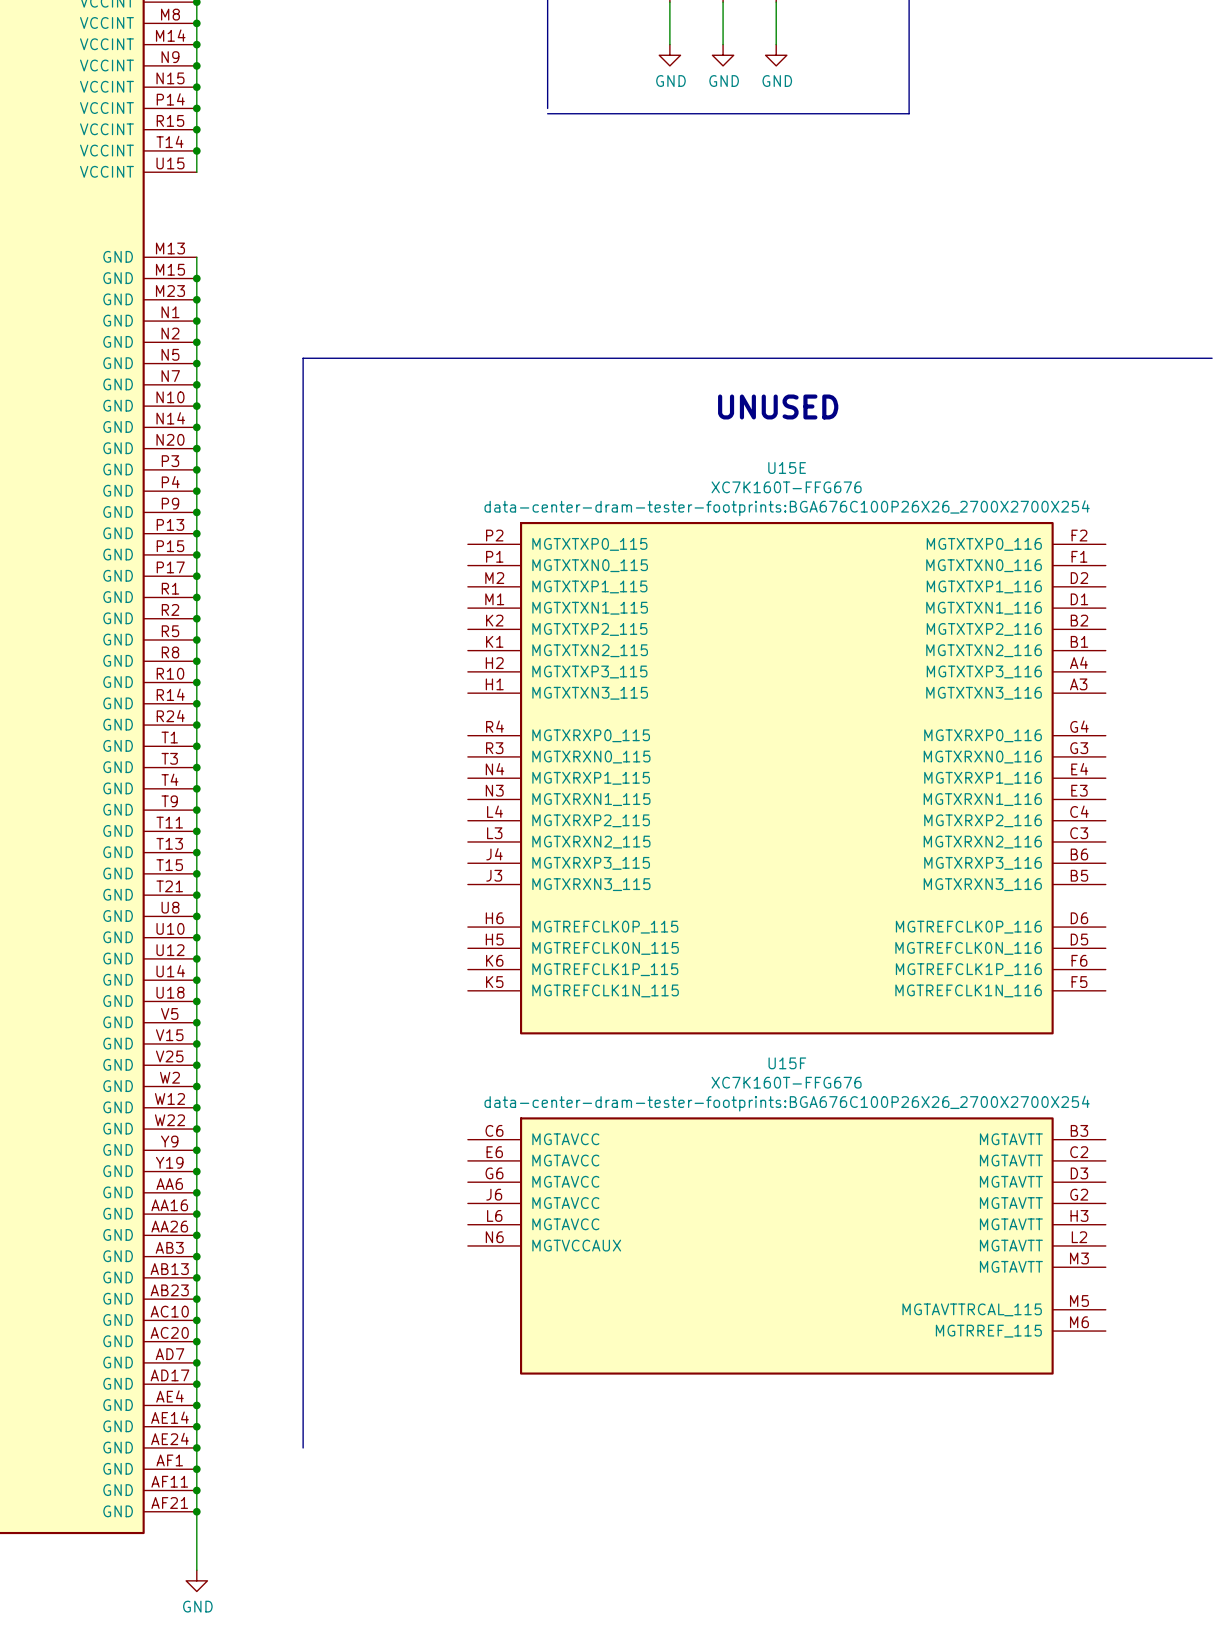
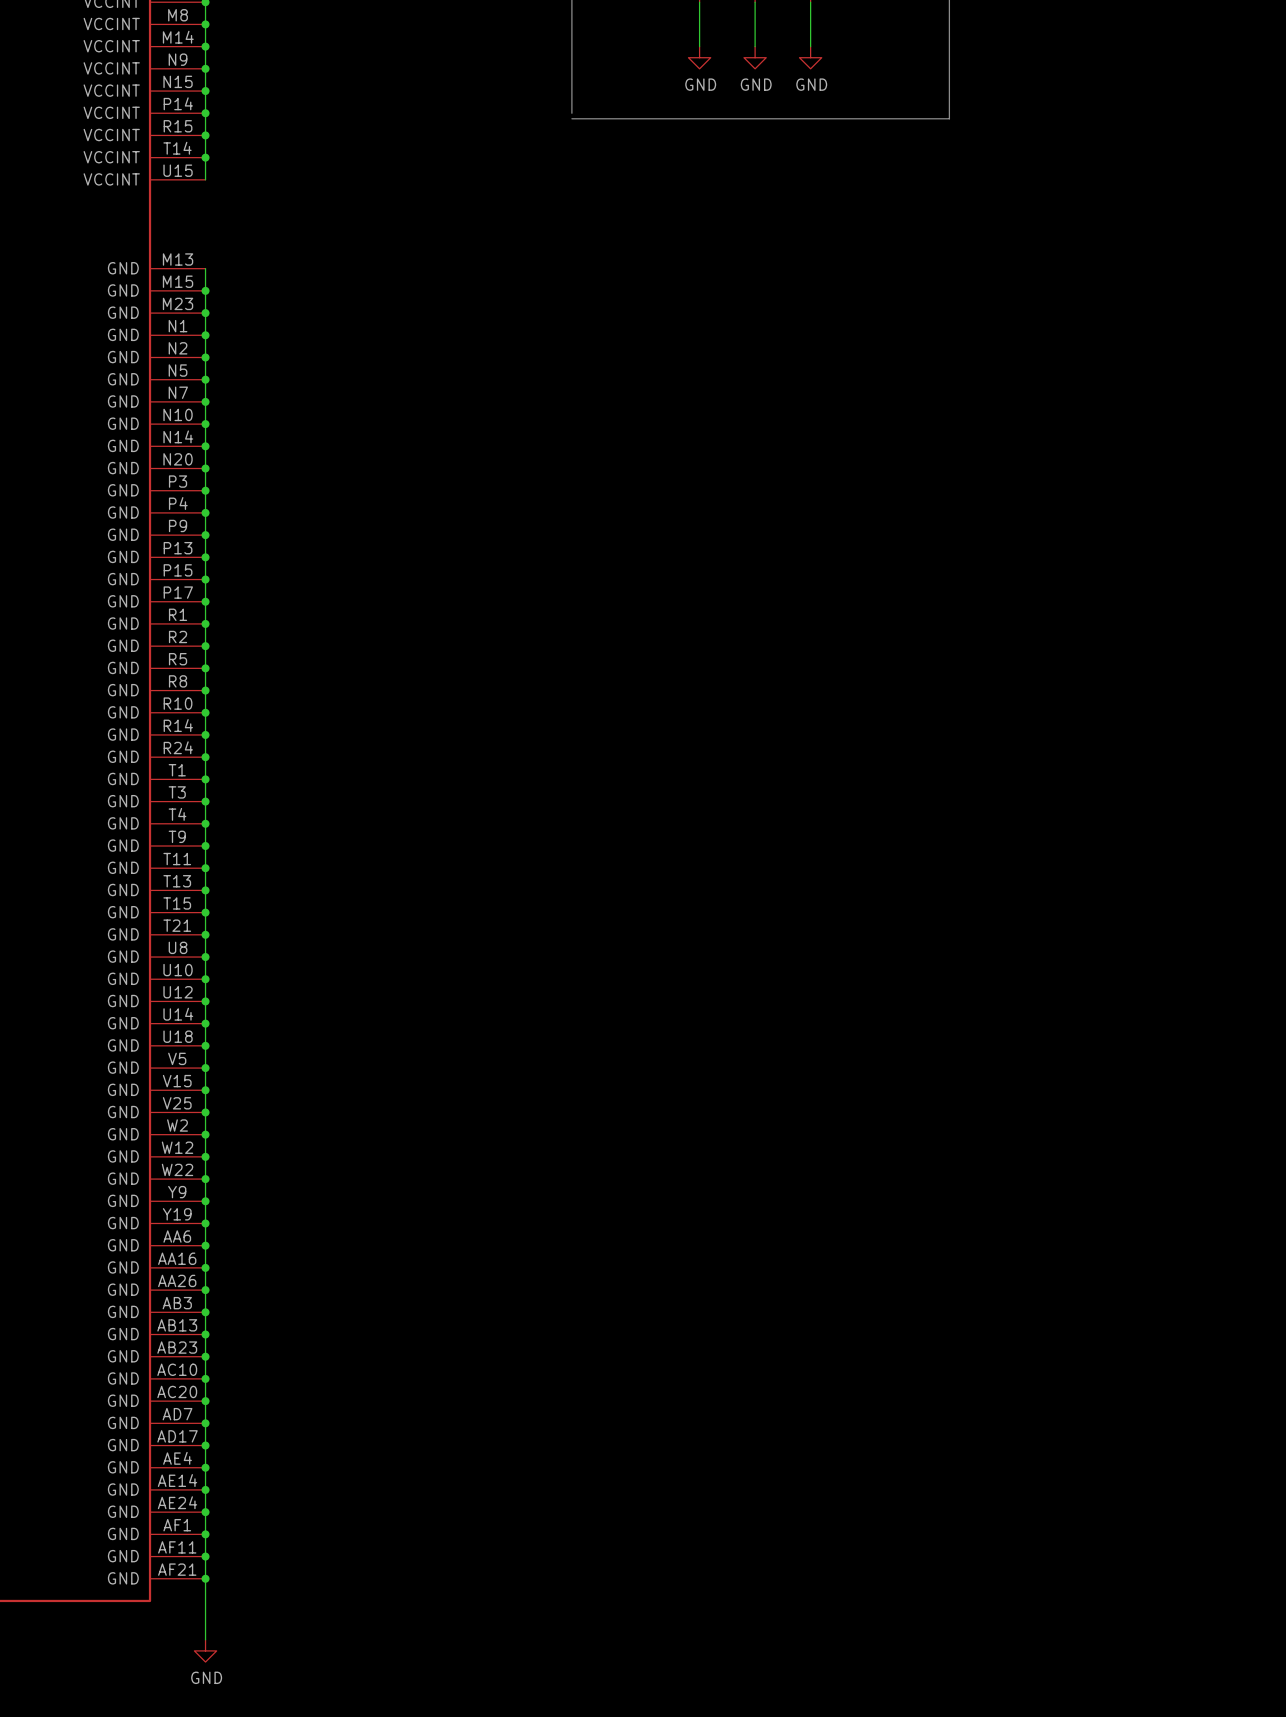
line: (1212, 358) (303, 358) (303, 1447) -> none
text: UNUSED (778, 406) -> none
U15E: XC7K160T-FFG676 (786, 778) -> none
U15F: XC7K160T-FFG676 (786, 1245) -> none

